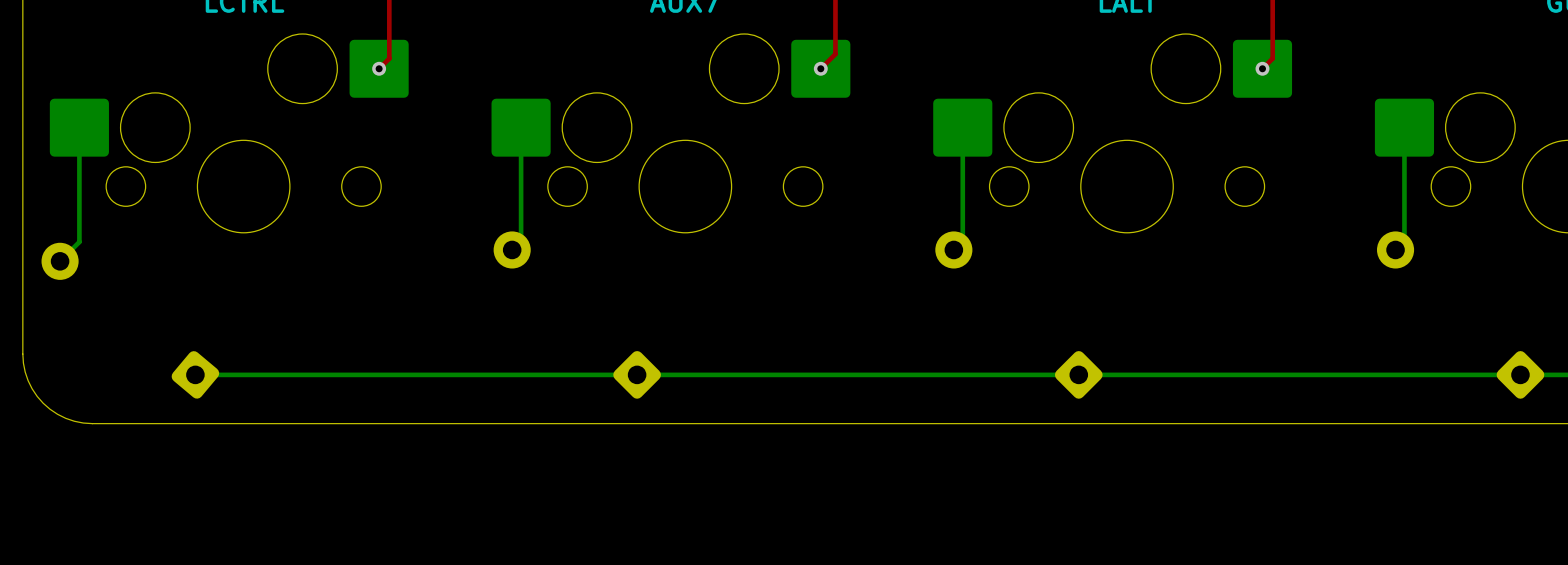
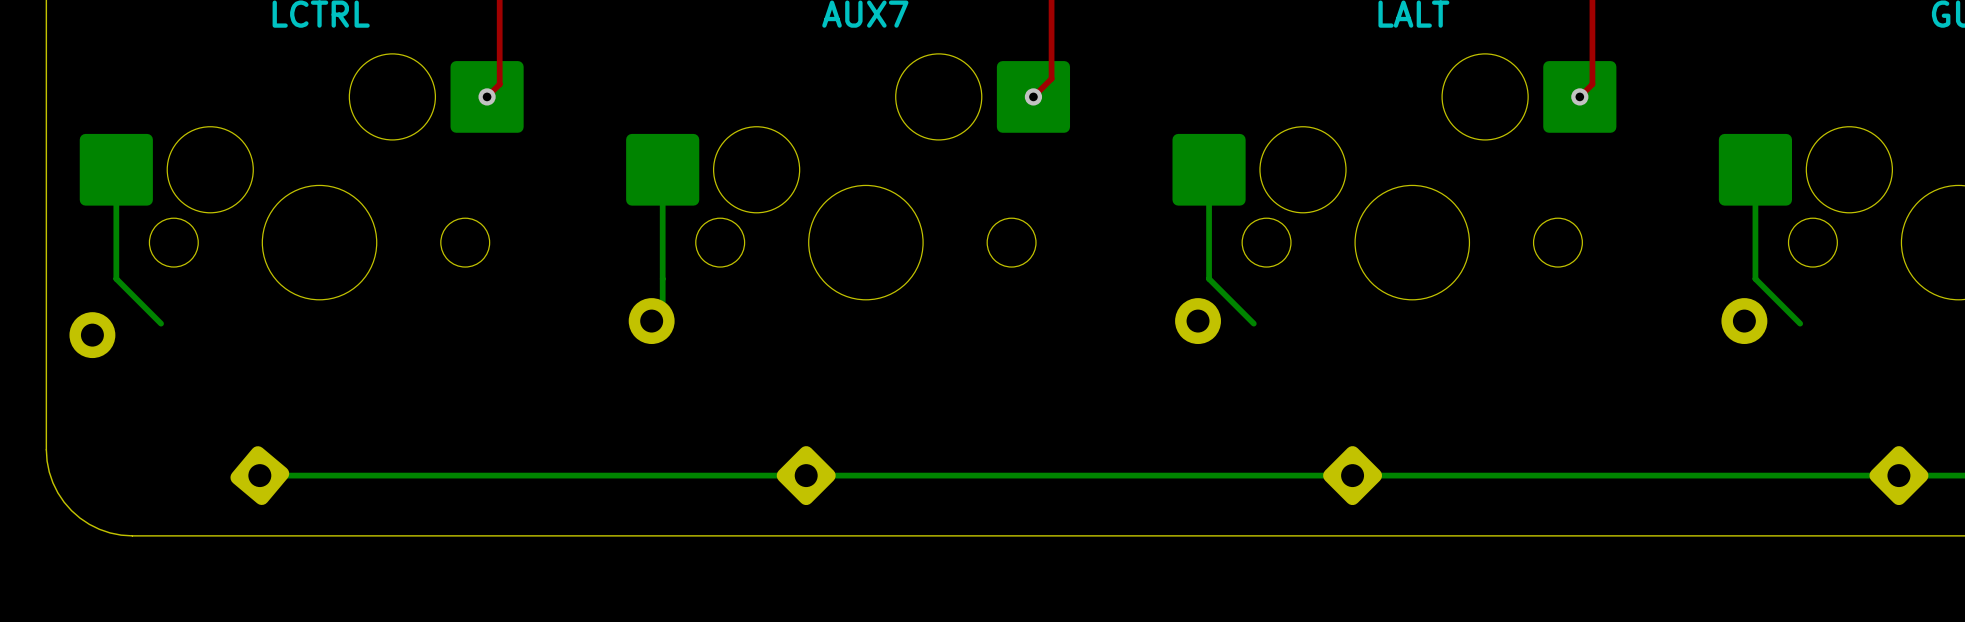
bottom track: (79, 215) (79, 242) (60, 261) -> (116, 278) (161, 323)
bottom track: (962, 215) (962, 241) (953, 249) -> (1209, 278) (1253, 323)
bottom track: (1404, 215) (1404, 241) (1395, 249) -> (1755, 278) (1800, 323)

